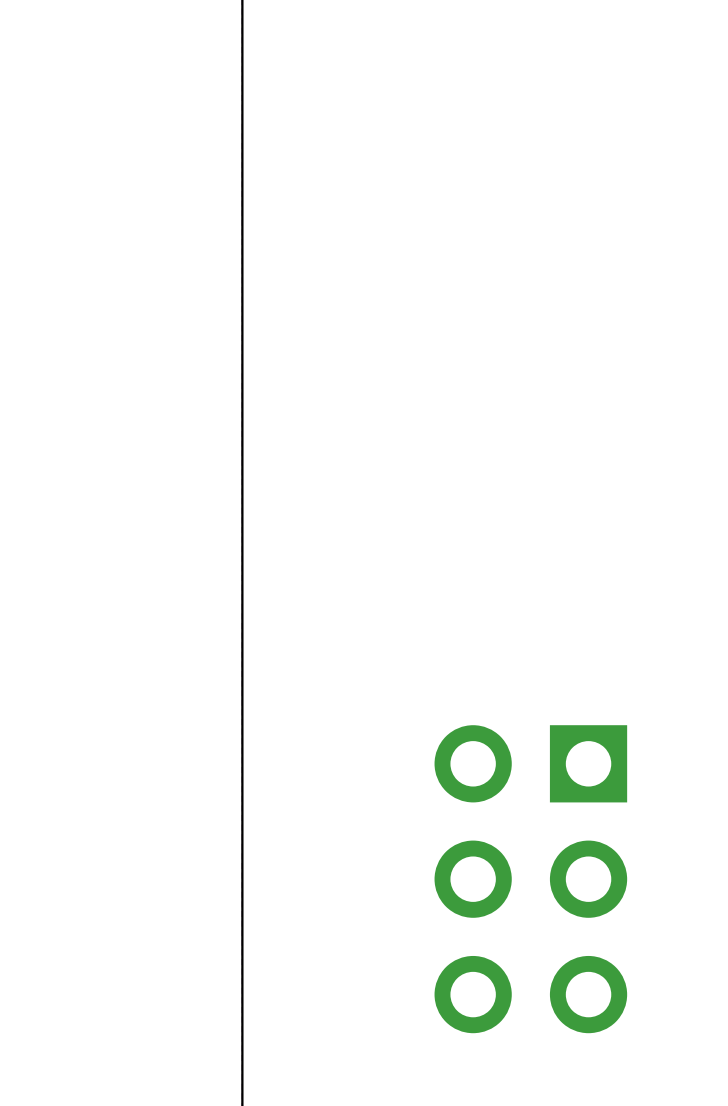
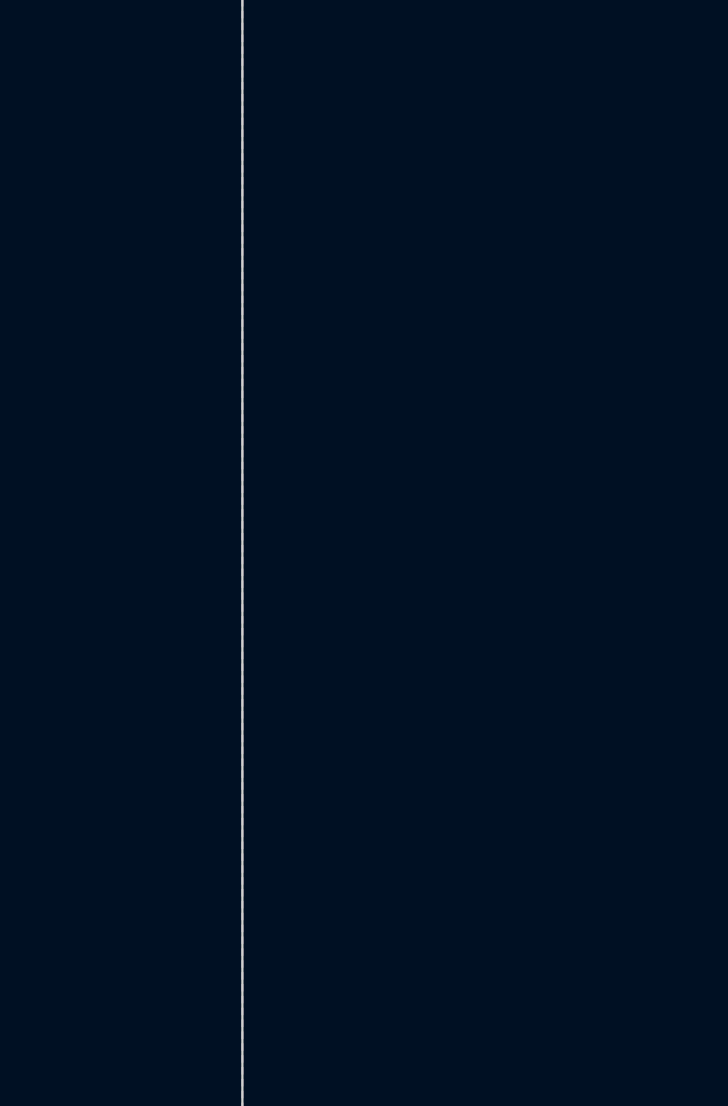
part: (530, 879) -> none

